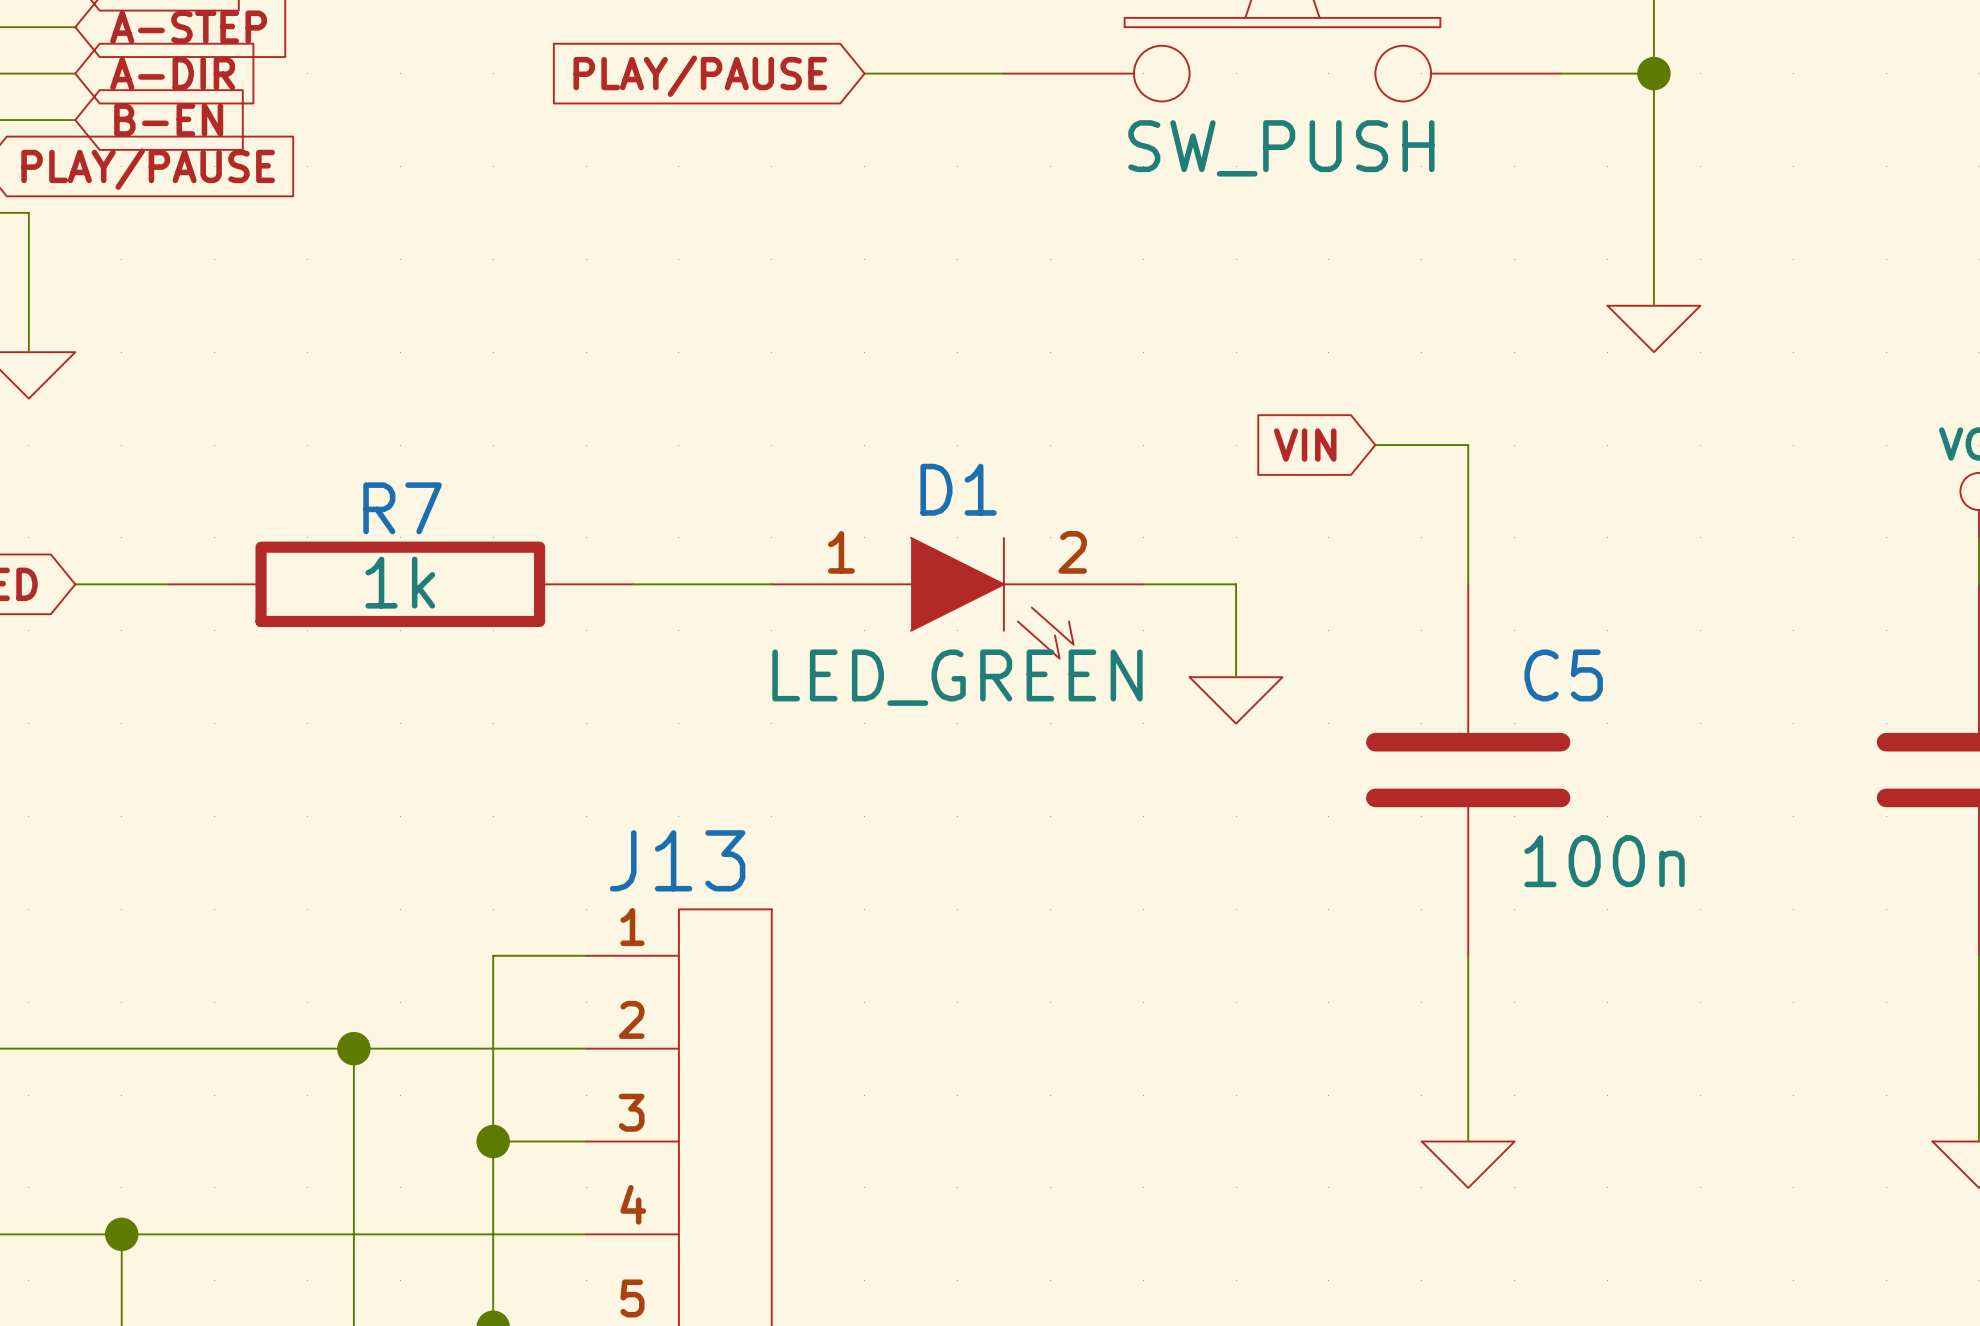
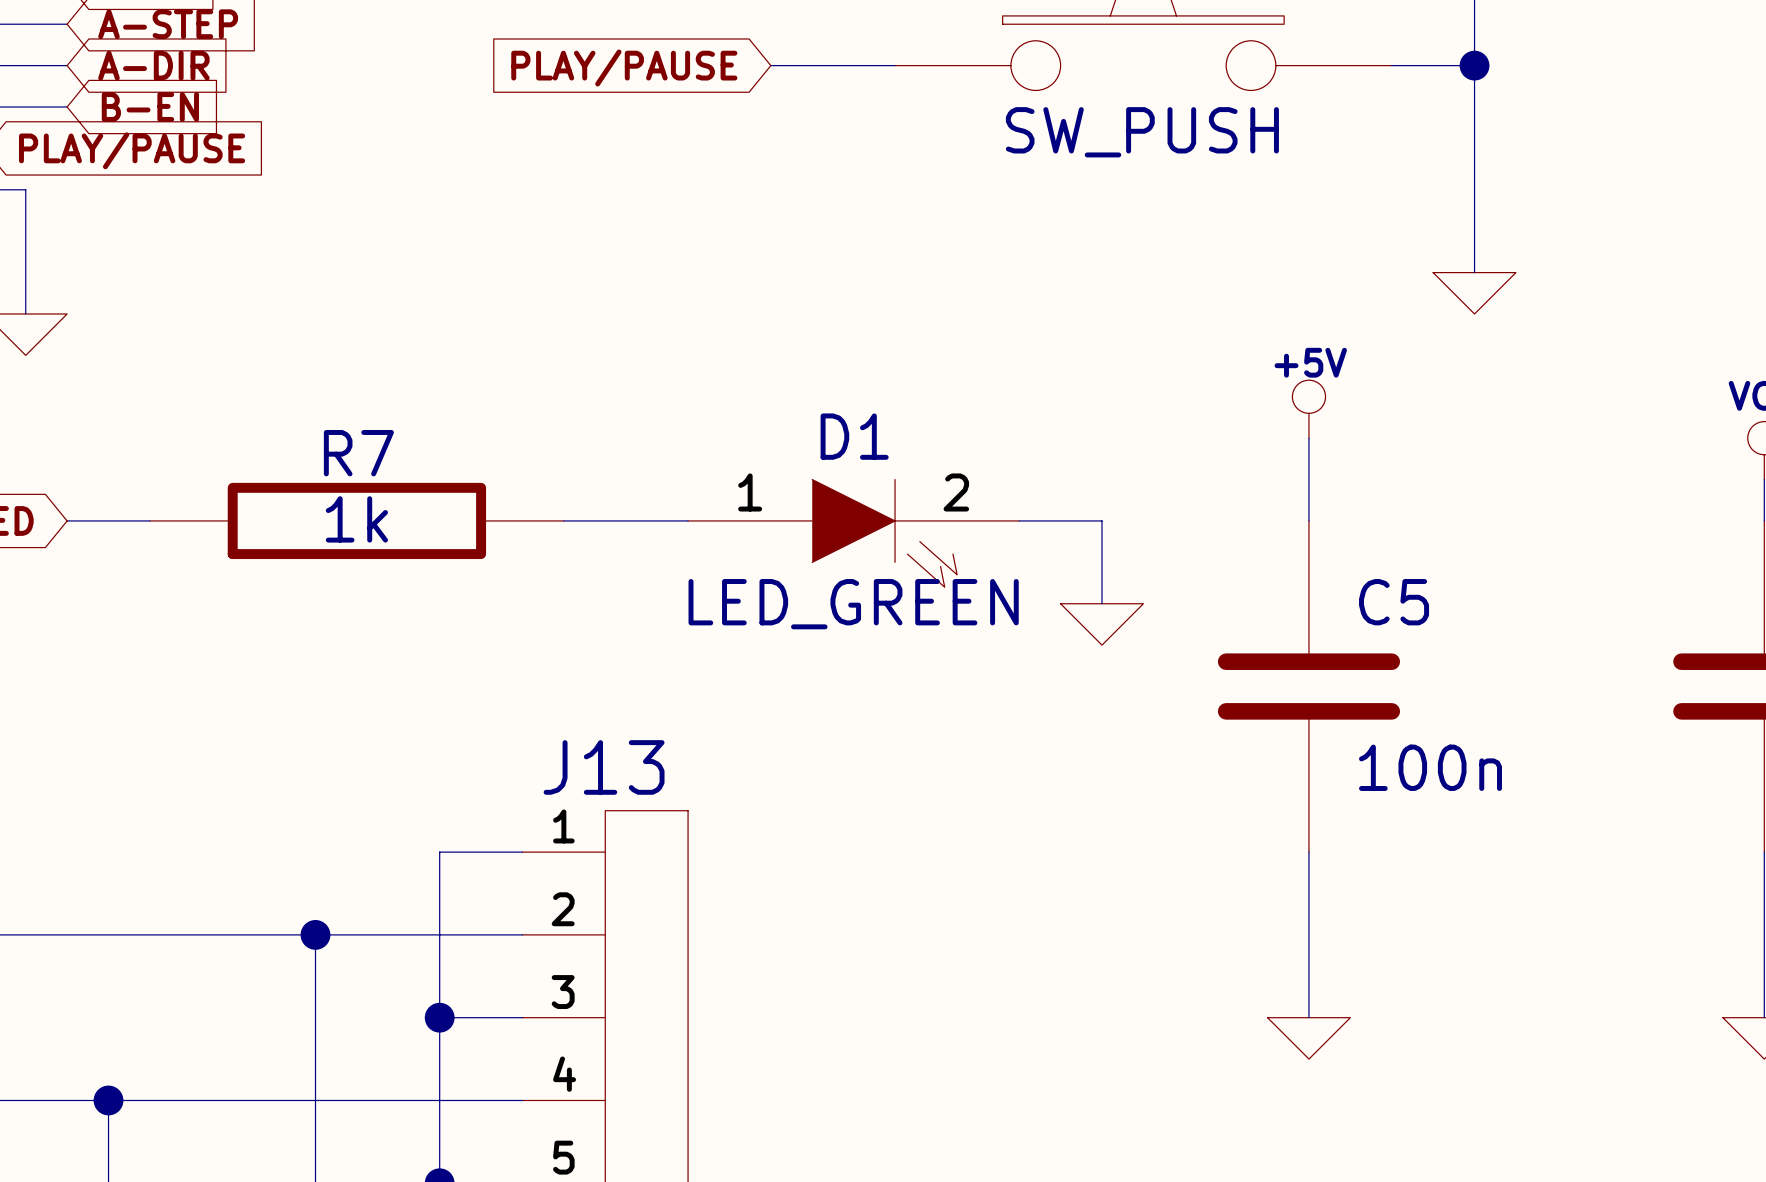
global label: VIN (1305, 445) -> none
wire: (1375, 445) (1468, 445) (1468, 491) -> none
power symbol: none -> +5V (1308, 409)

